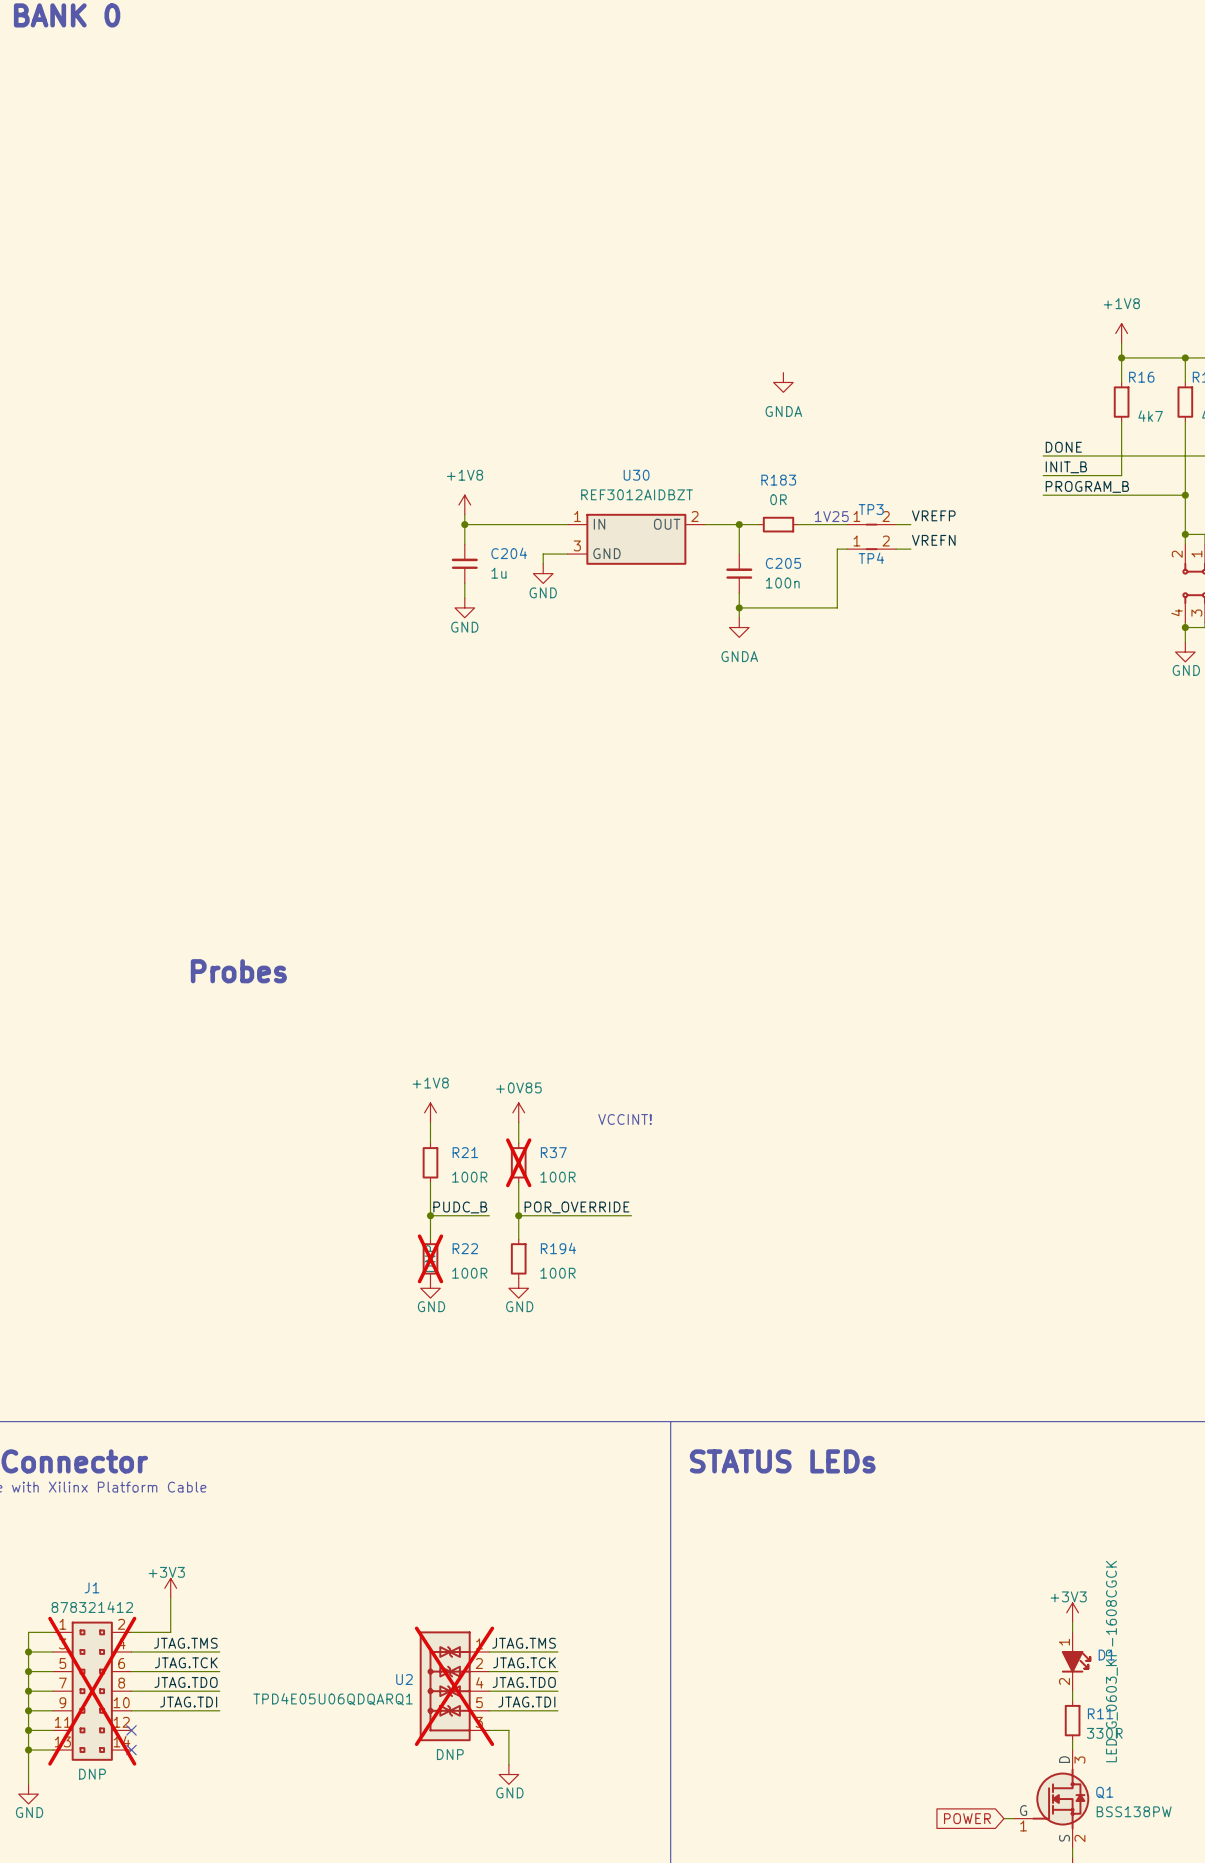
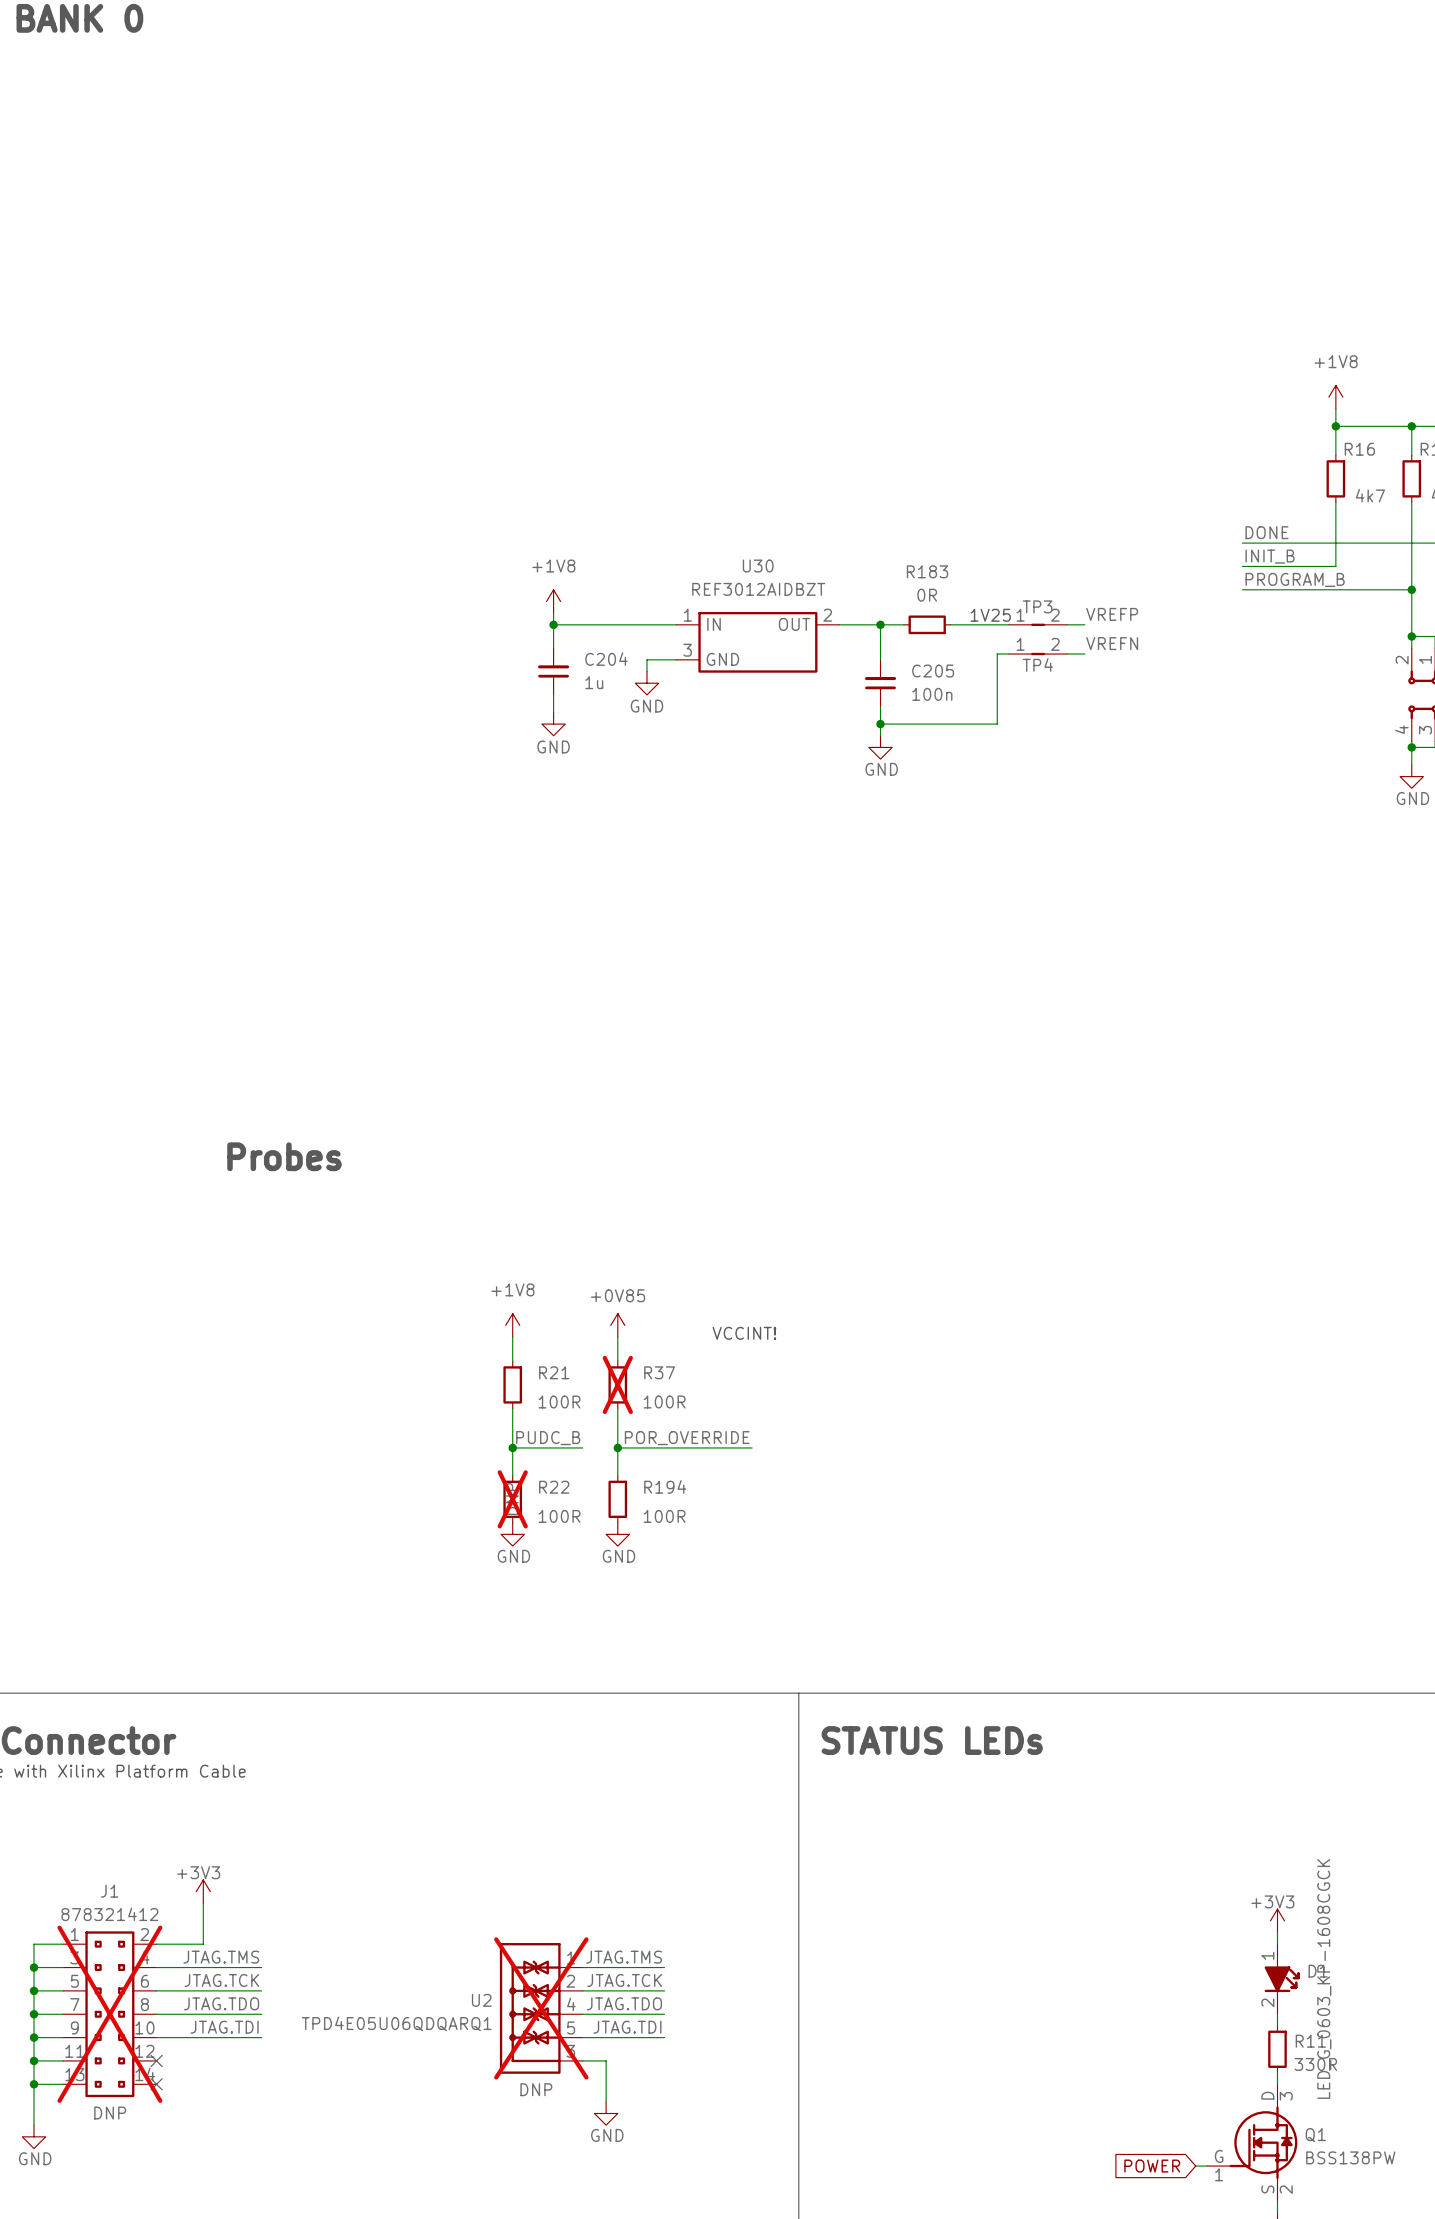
power symbol: GNDA (783, 382) -> none
power symbol: GNDA (739, 627) -> GND (880, 747)

